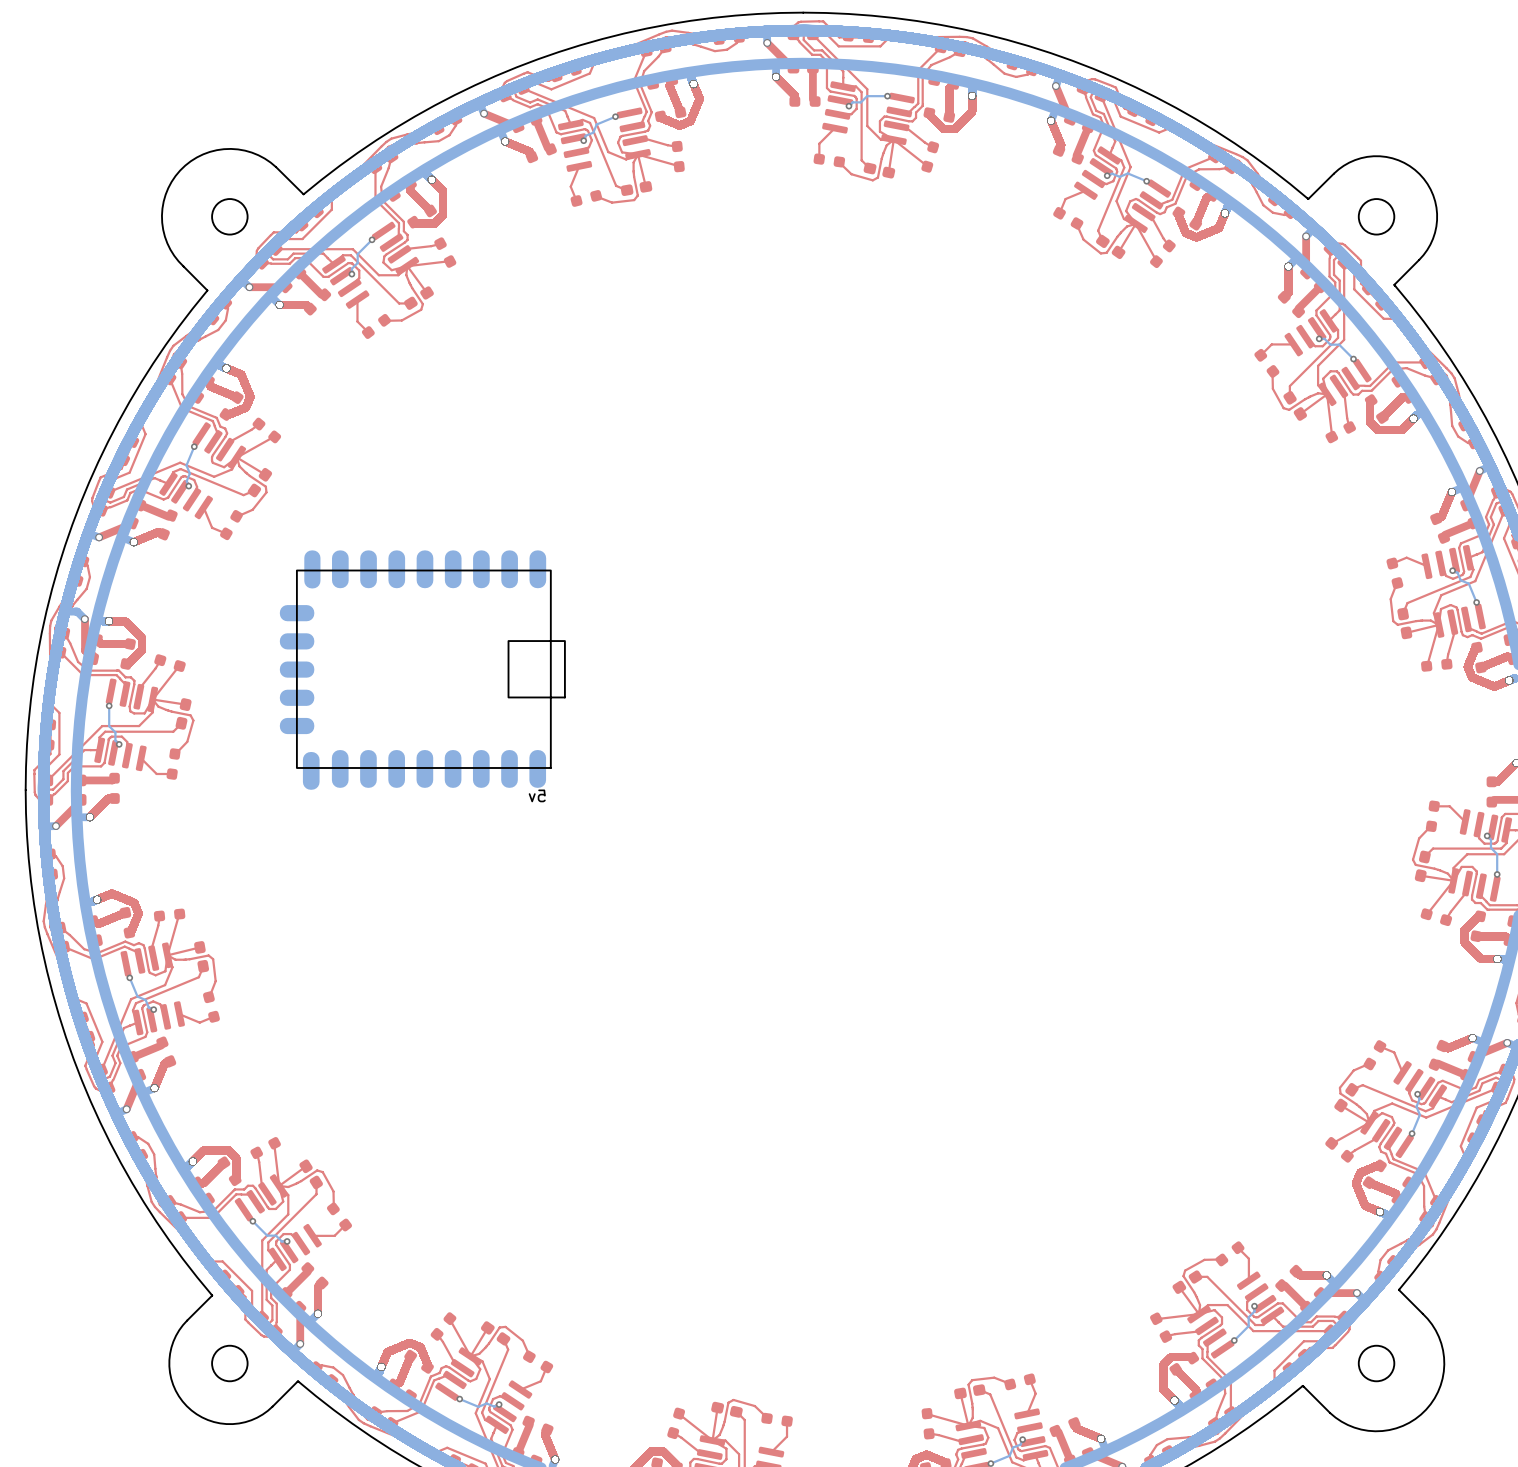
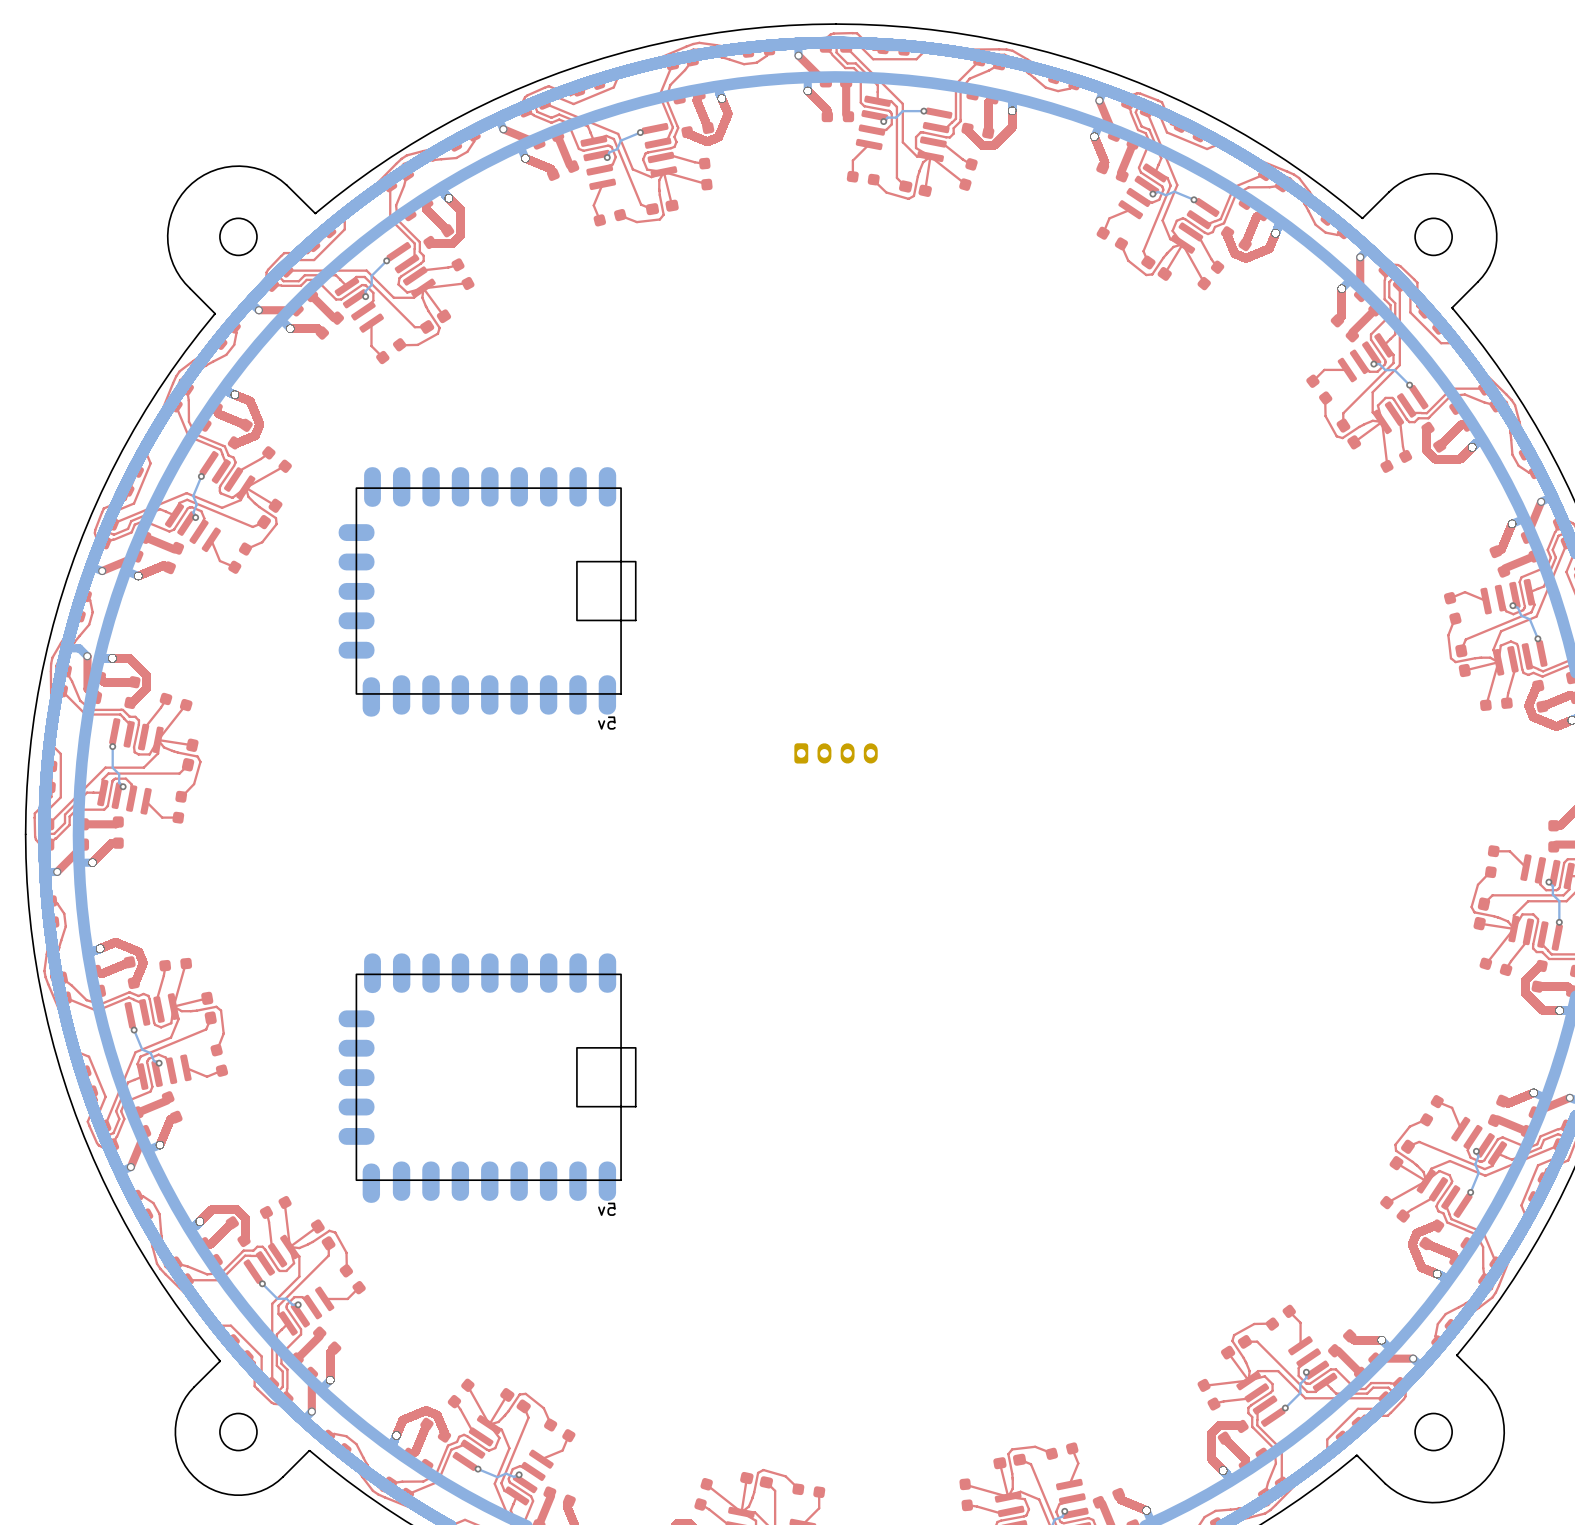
part position: (422, 670) -> (487, 591)
part: none -> (836, 753)
part: none -> (487, 1078)

